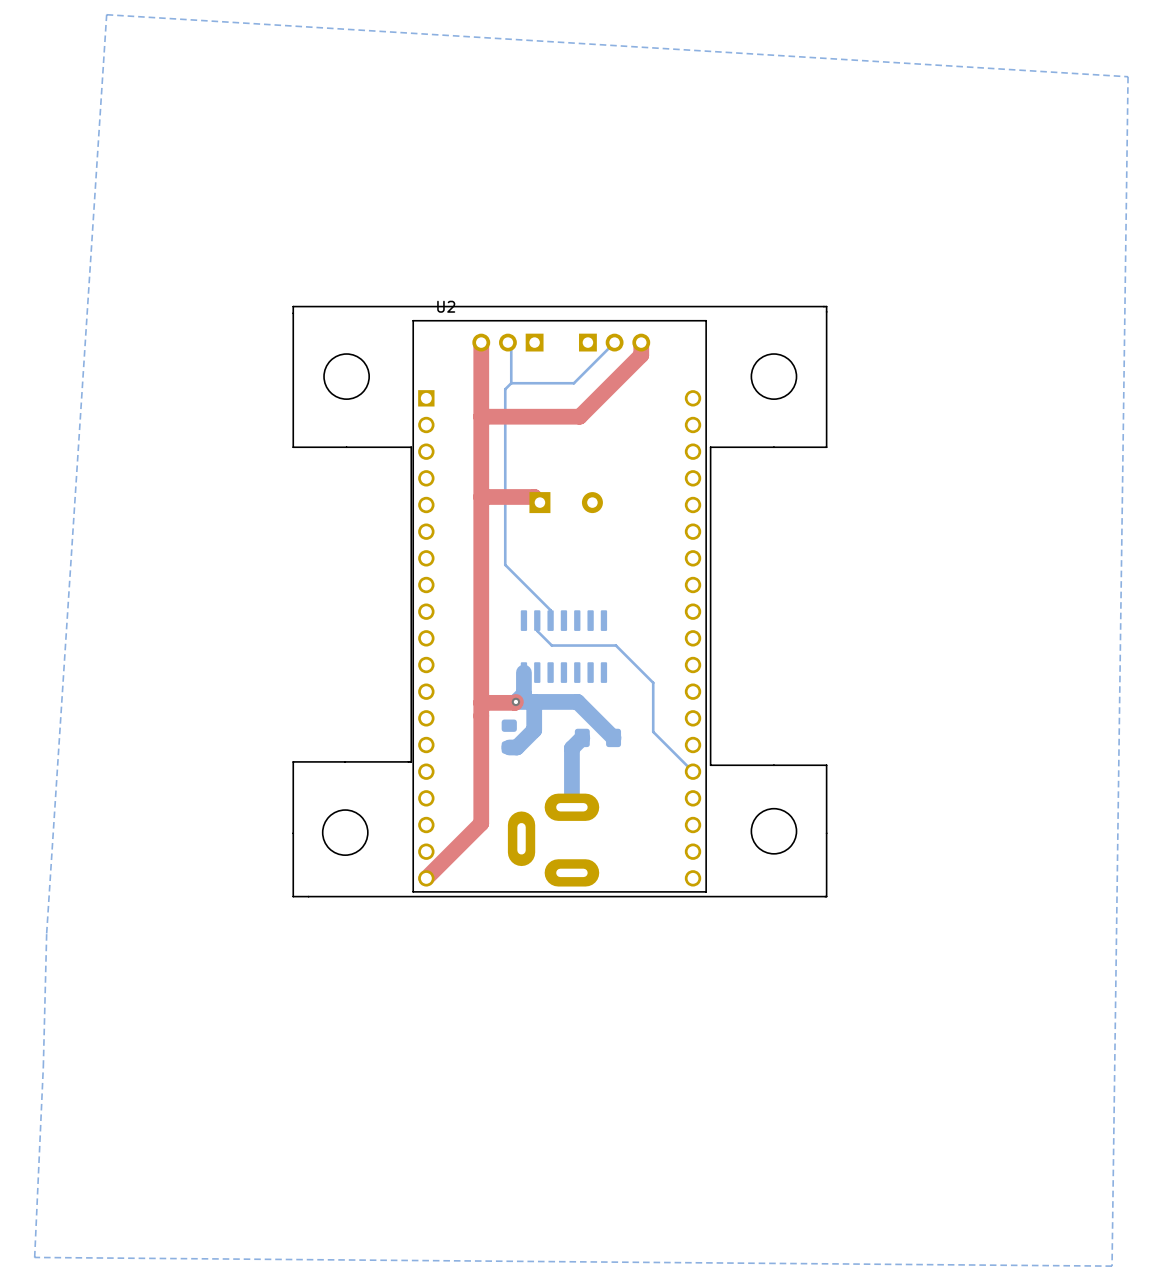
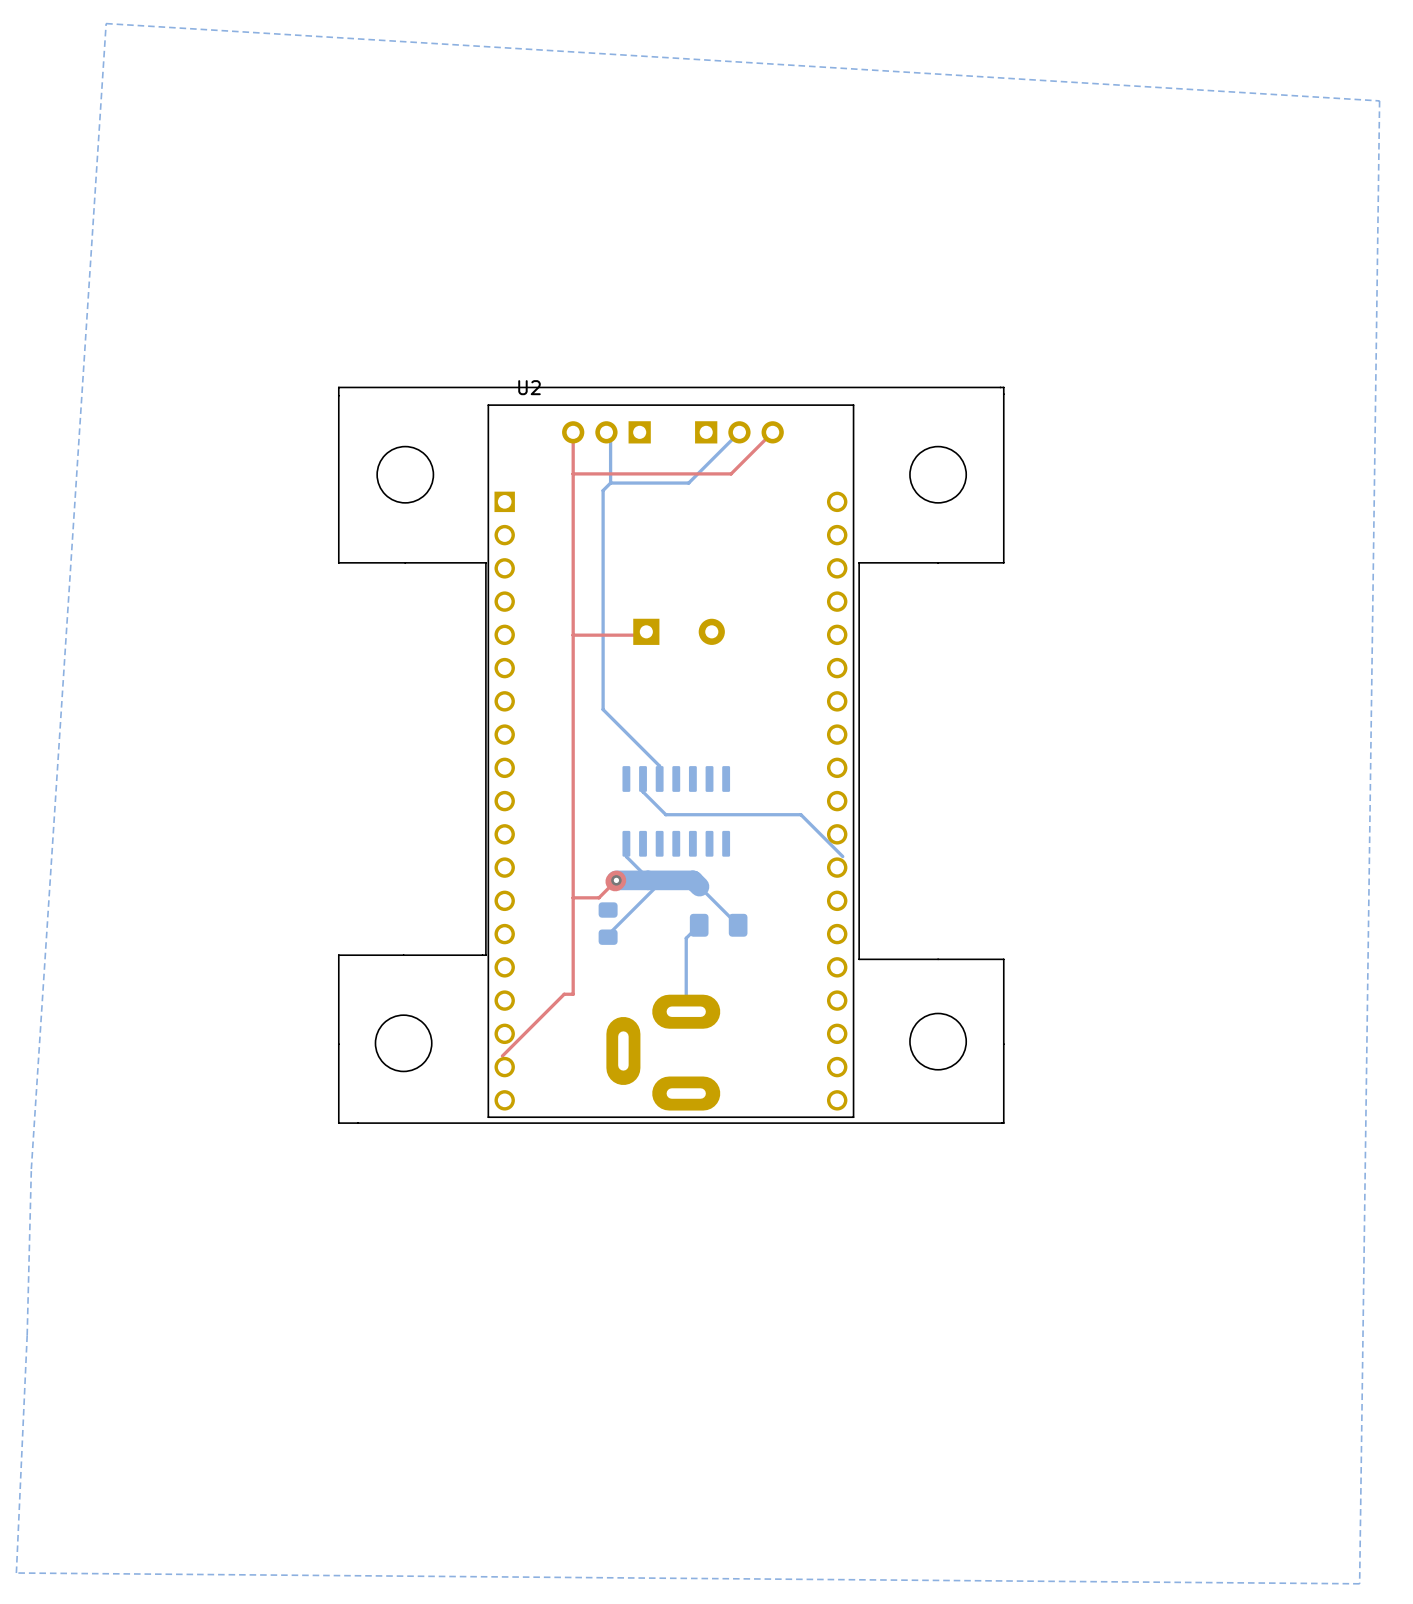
top track width: thick (481, 342) (481, 793) -> thin (573, 432) (573, 994)
top track: (641, 342) (641, 355) (579, 416) (481, 416) -> (772, 432) (731, 473) (573, 473)
top track: (481, 496) (534, 496) (539, 502) -> none
top track: none -> (573, 635) (643, 635)
bottom track: (551, 645) (615, 645) (653, 682) (653, 731) (693, 771) -> (661, 810) (665, 814) (800, 814) (842, 856)
bottom track: (523, 672) (523, 693) (515, 701) -> none
bottom track: none -> (626, 856) (656, 886) (608, 934)
bottom track: (534, 701) (534, 730) (516, 747) (509, 747) -> none
top track: (481, 702) (515, 702) -> (573, 897) (598, 897) (615, 881)
bottom track width: thick (582, 706) (613, 737) -> thin (699, 886) (738, 925)
bottom track width: thick (582, 737) (571, 748) (571, 807) -> thin (699, 925) (686, 938) (686, 1011)
top track: (481, 793) (481, 823) (426, 878) -> (573, 994) (564, 994) (502, 1056)

